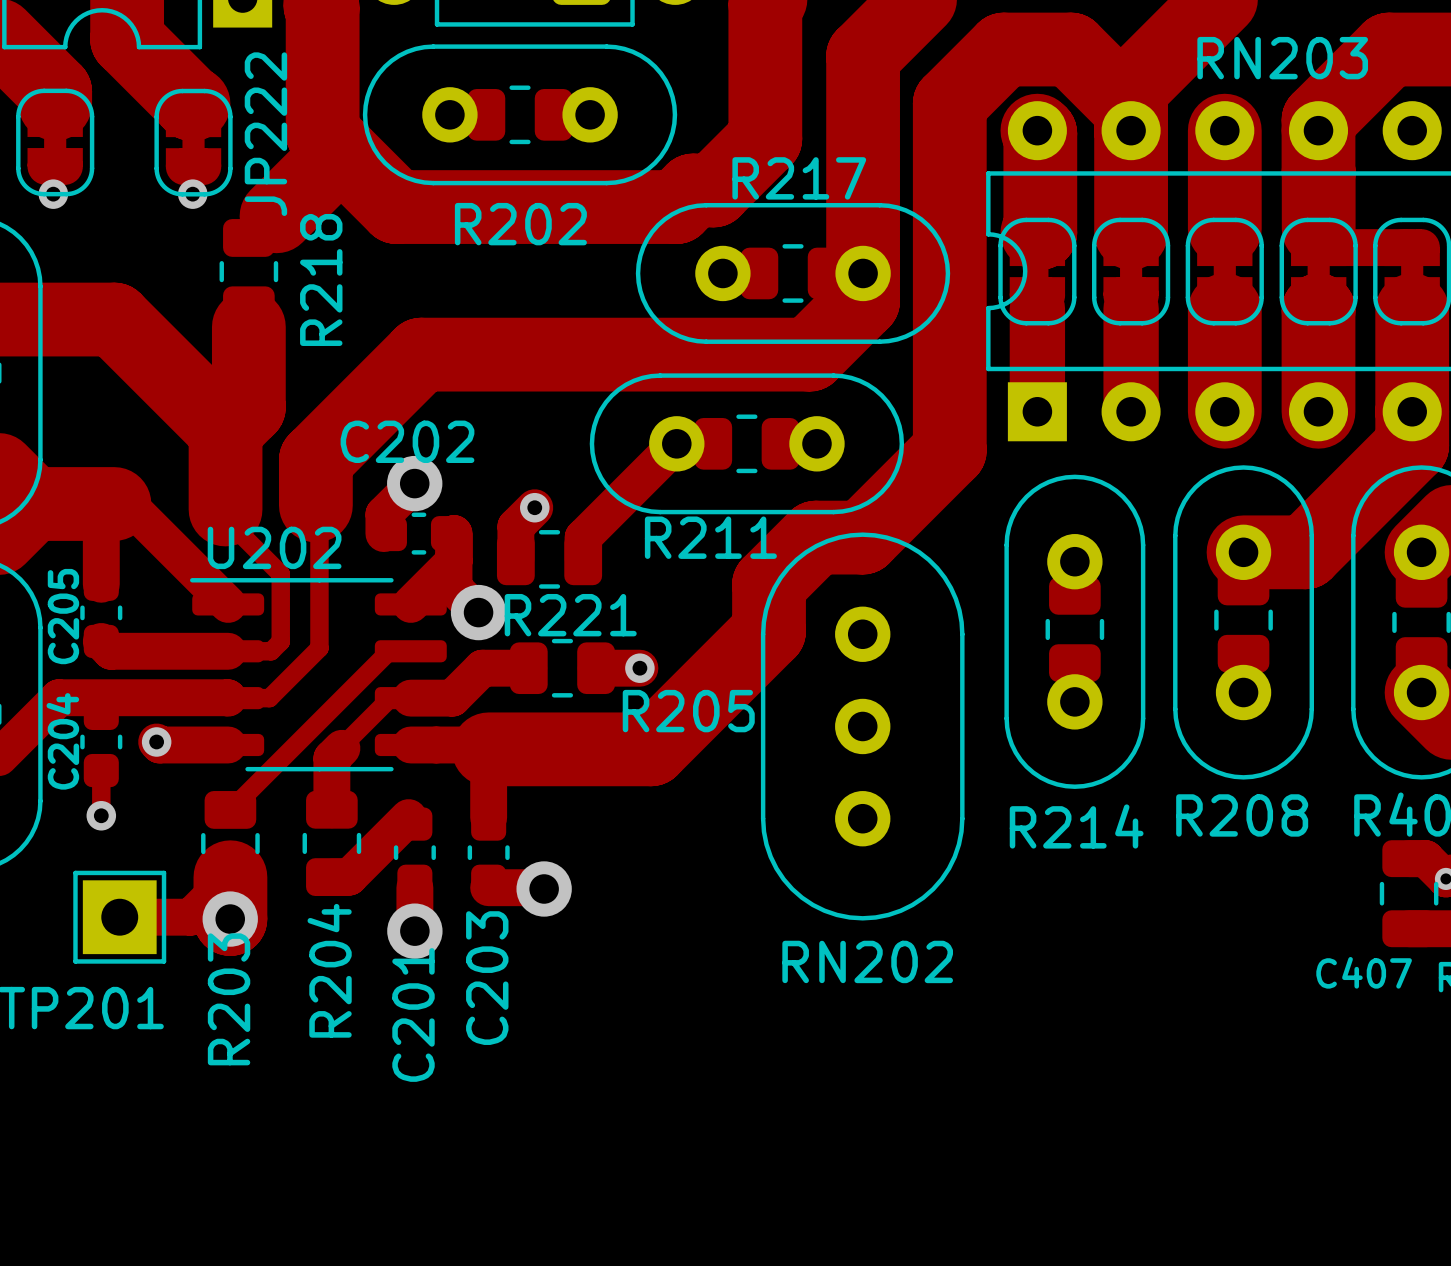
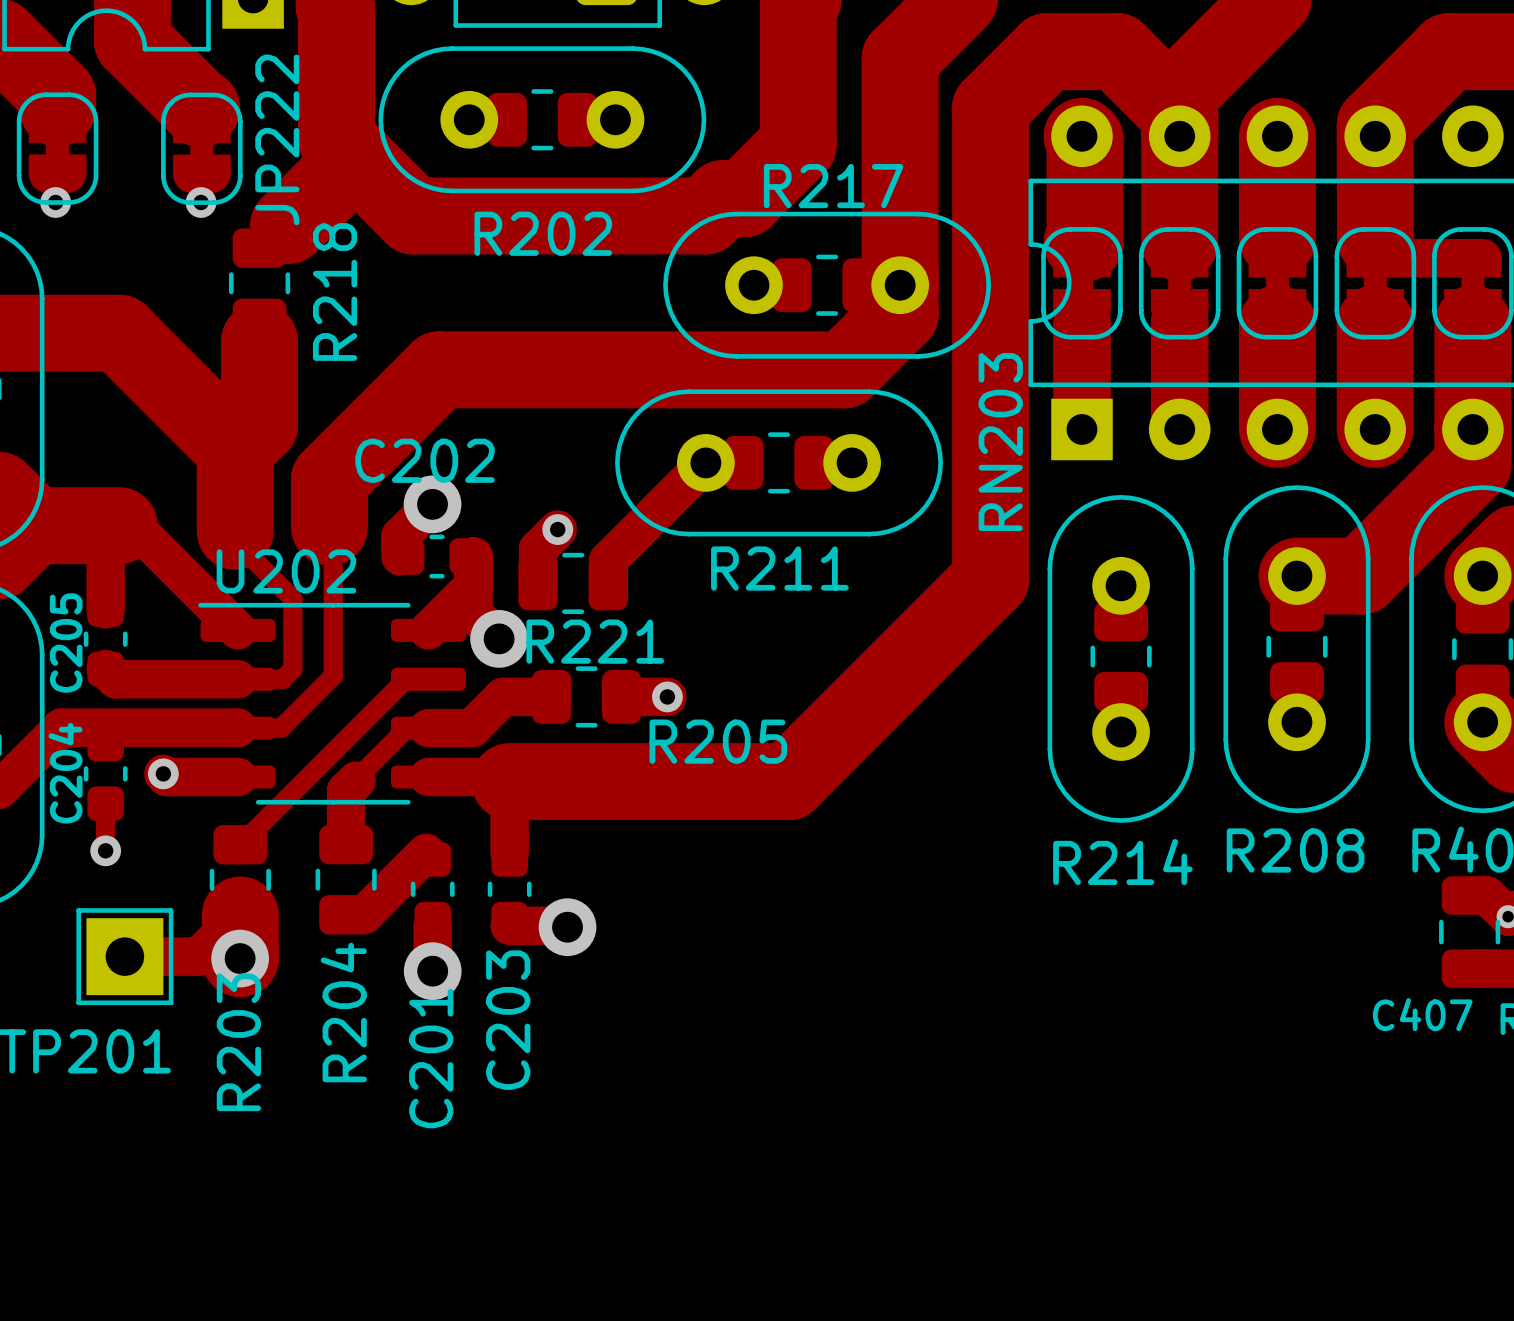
RN203 name rotation: 0° (1282, 58) -> 90° counterclockwise (1000, 442)
RN203 name position: RN203 (1282, 58) -> RN203 (1000, 442)
track: (949, 450) (862, 537) (815, 537) (769, 584) (769, 631) (650, 749) -> (990, 469) (990, 579) (788, 781) (678, 781)
R211 name position: R211 (710, 537) -> R211 (779, 568)
RN202: (862, 726) -> none

